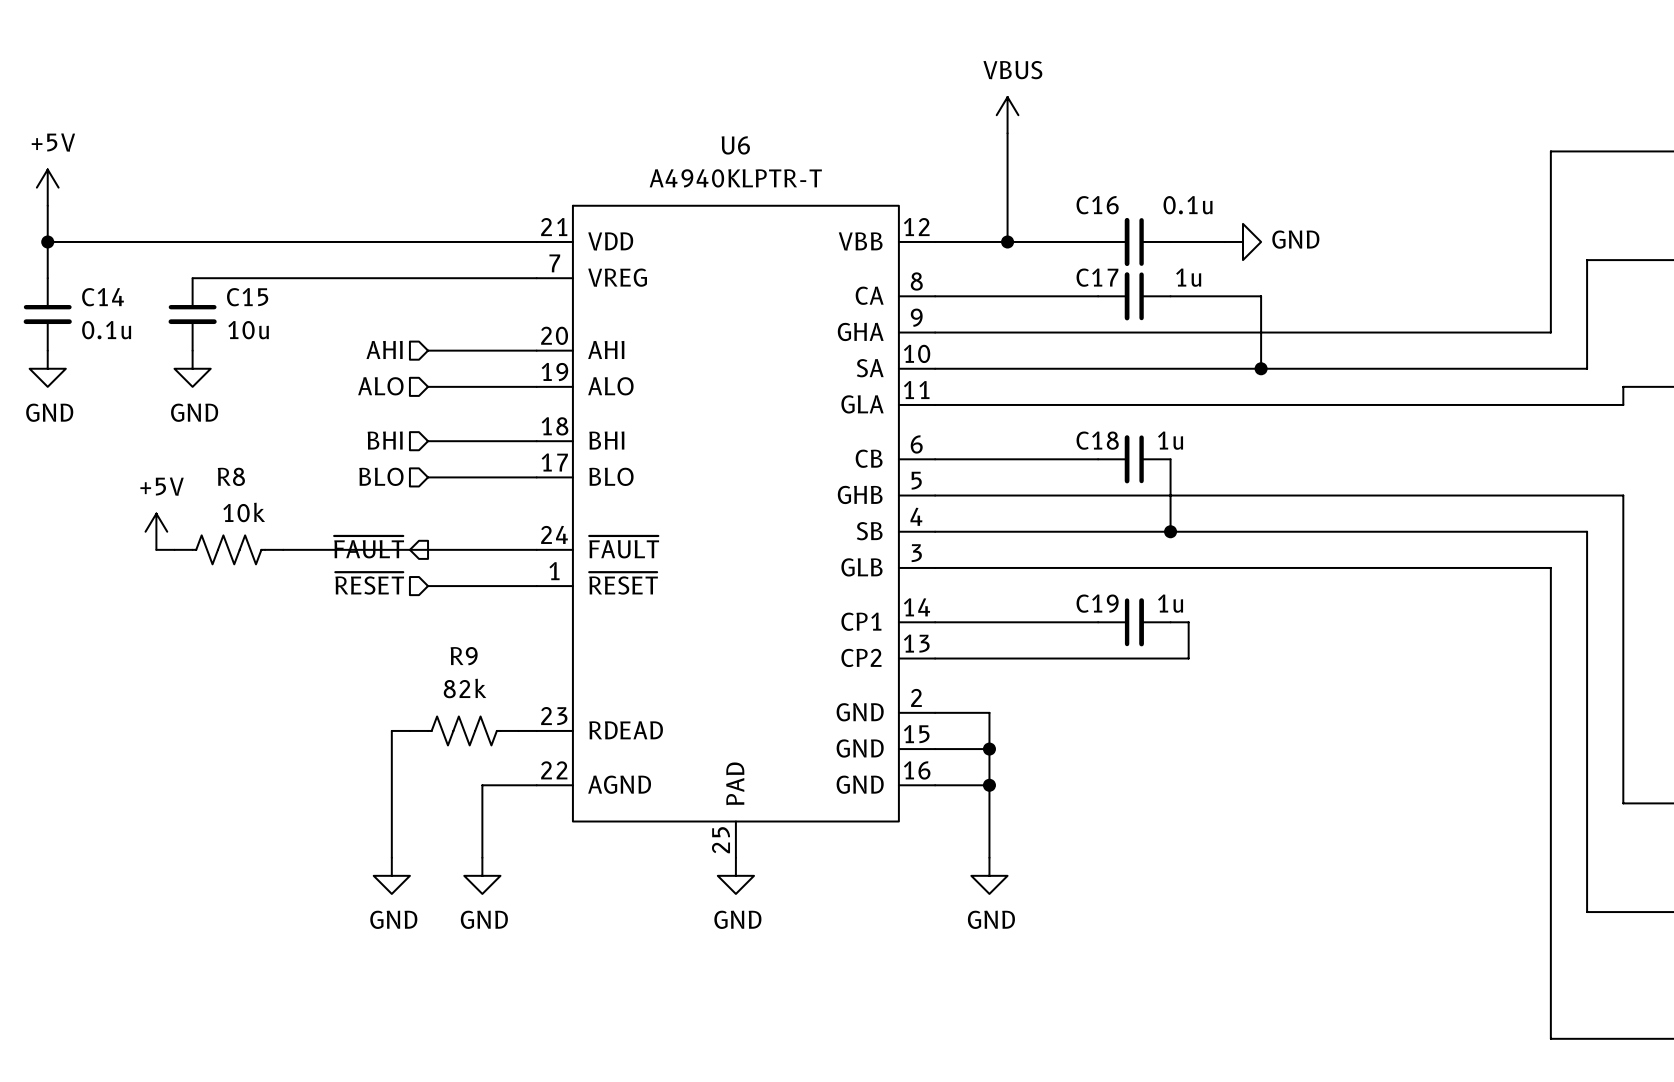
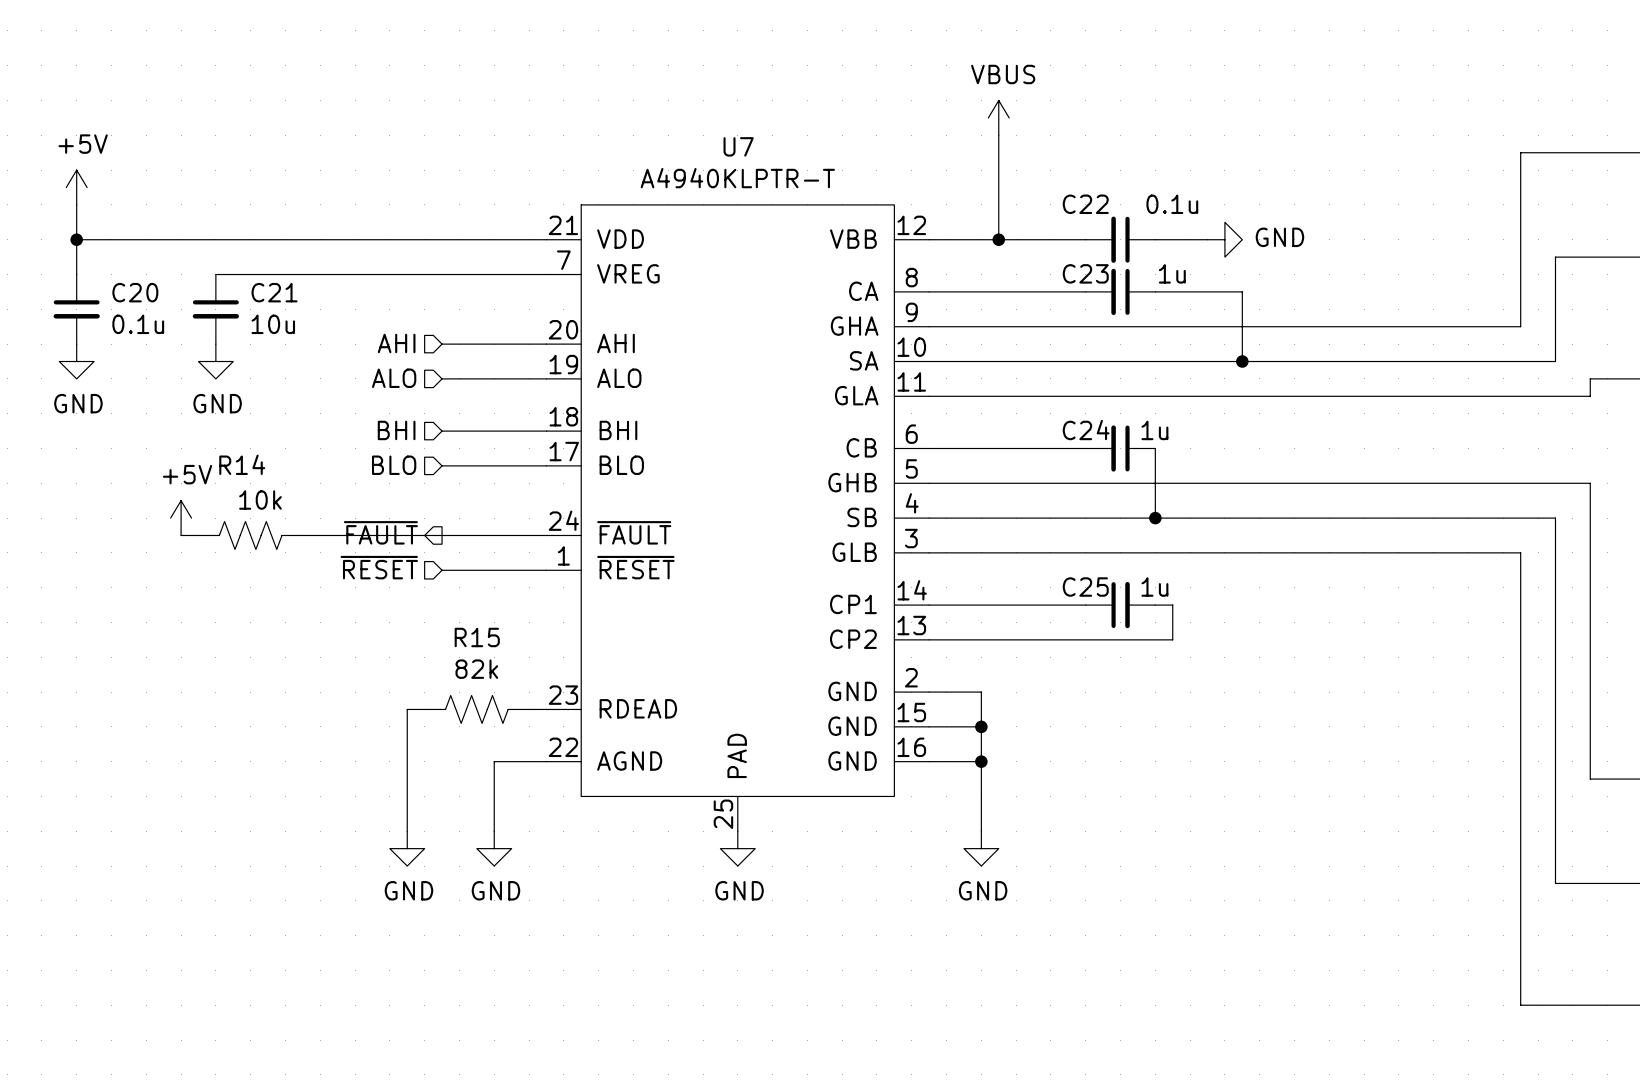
U6 name: U6 (735, 145) -> U7 (738, 146)
C16 name: C16 (1097, 205) -> C22 (1085, 204)
C17 name: C17 (1097, 277) -> C23 (1085, 273)
C14 name: C14 (103, 297) -> C20 (135, 292)
C15 name: C15 (247, 297) -> C21 (274, 292)
C18 name: C18 (1097, 440) -> C24 (1086, 430)
R8 name: R8 (231, 476) -> R14 (242, 464)
C19 name: C19 (1097, 603) -> C25 (1085, 587)
R9 name: R9 (464, 656) -> R15 (477, 637)

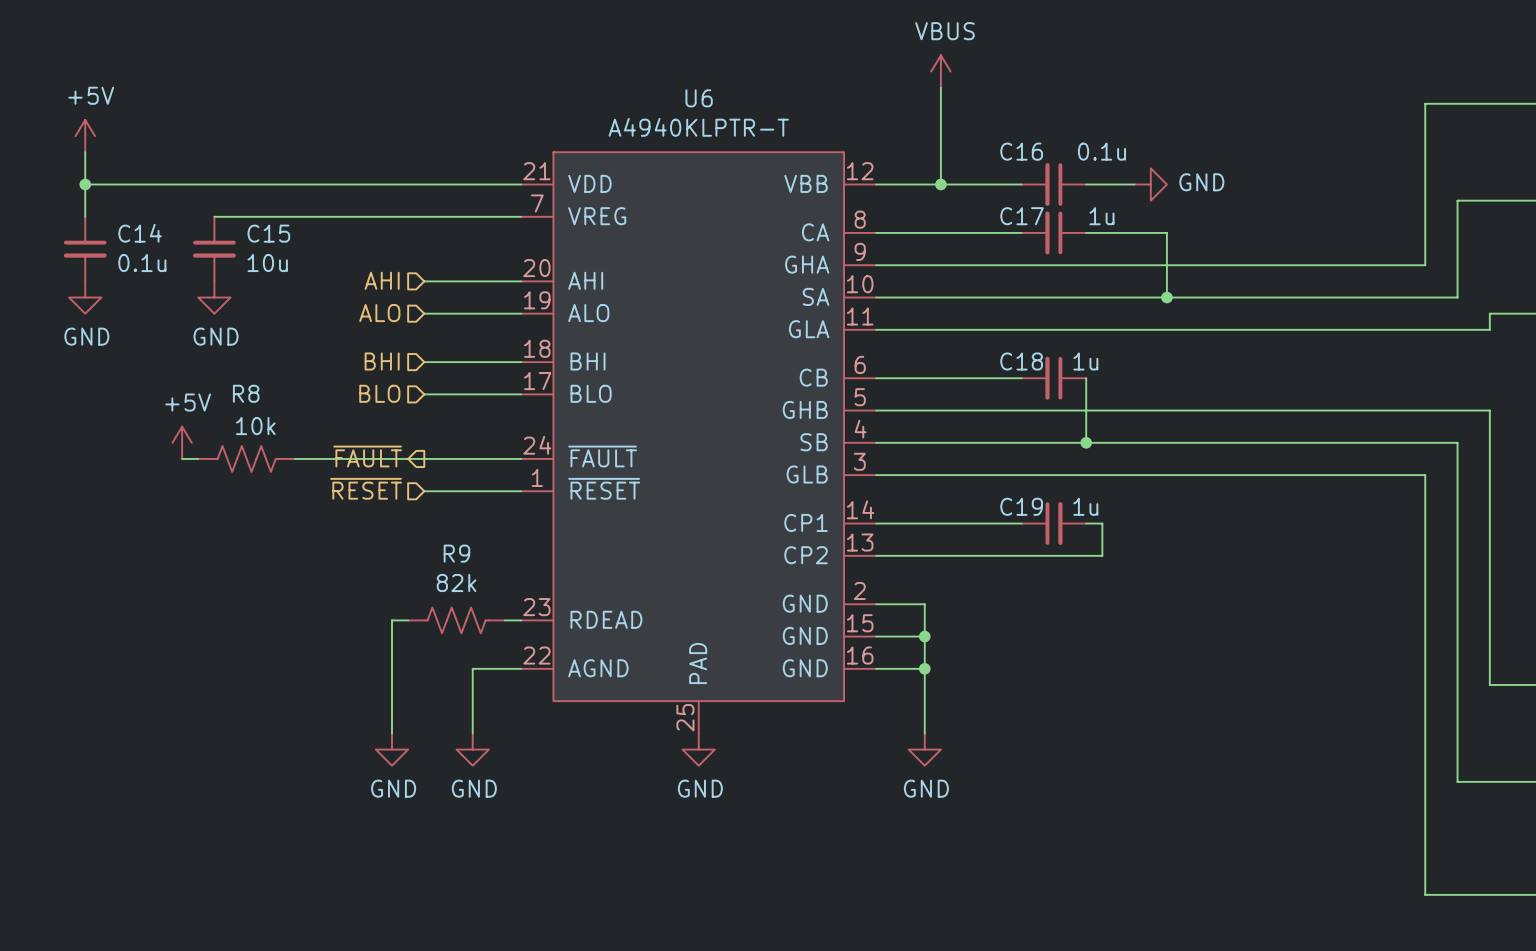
U7 name: U7 (738, 146) -> U6 (699, 98)
C22 name: C22 (1085, 204) -> C16 (1021, 151)
C23 name: C23 (1085, 273) -> C17 (1022, 216)
C20 name: C20 (135, 292) -> C14 (140, 233)
C21 name: C21 (274, 292) -> C15 (268, 233)
C24 name: C24 (1086, 430) -> C18 (1021, 361)
R14 name: R14 (242, 464) -> R8 (246, 393)
C25 name: C25 (1085, 587) -> C19 (1021, 506)
R15 name: R15 (477, 637) -> R9 (456, 553)

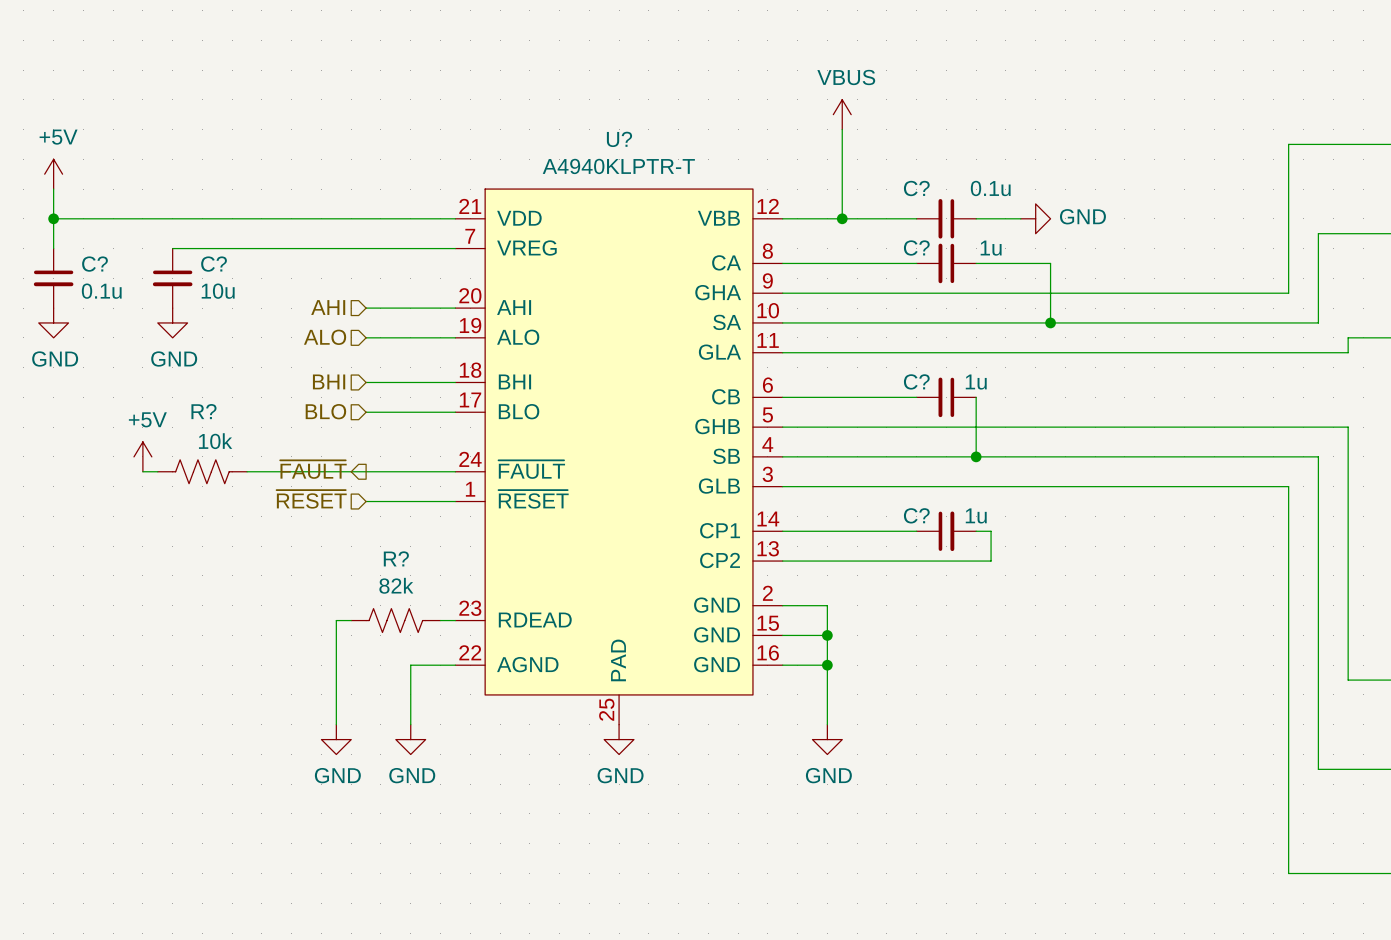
U6 name: U6 (699, 98) -> U? (619, 139)
C16 name: C16 (1021, 151) -> C? (916, 188)
C17 name: C17 (1022, 216) -> C? (916, 248)
C14 name: C14 (140, 233) -> C? (94, 264)
C15 name: C15 (268, 233) -> C? (214, 264)
C18 name: C18 (1021, 361) -> C? (916, 381)
R8 name: R8 (246, 393) -> R? (203, 411)
C19 name: C19 (1021, 506) -> C? (916, 515)
R9 name: R9 (456, 553) -> R? (396, 558)

